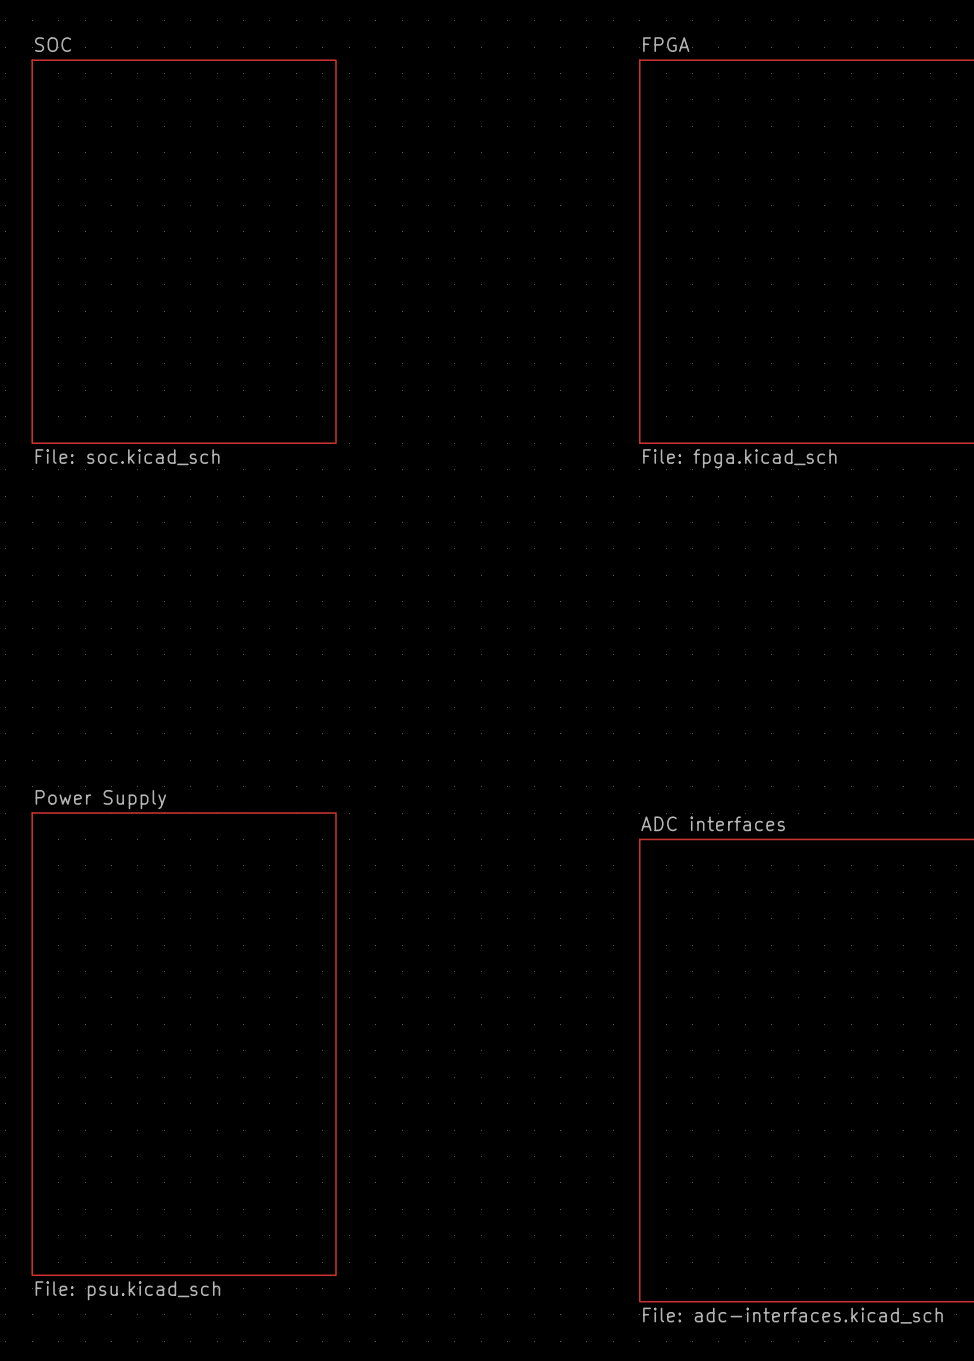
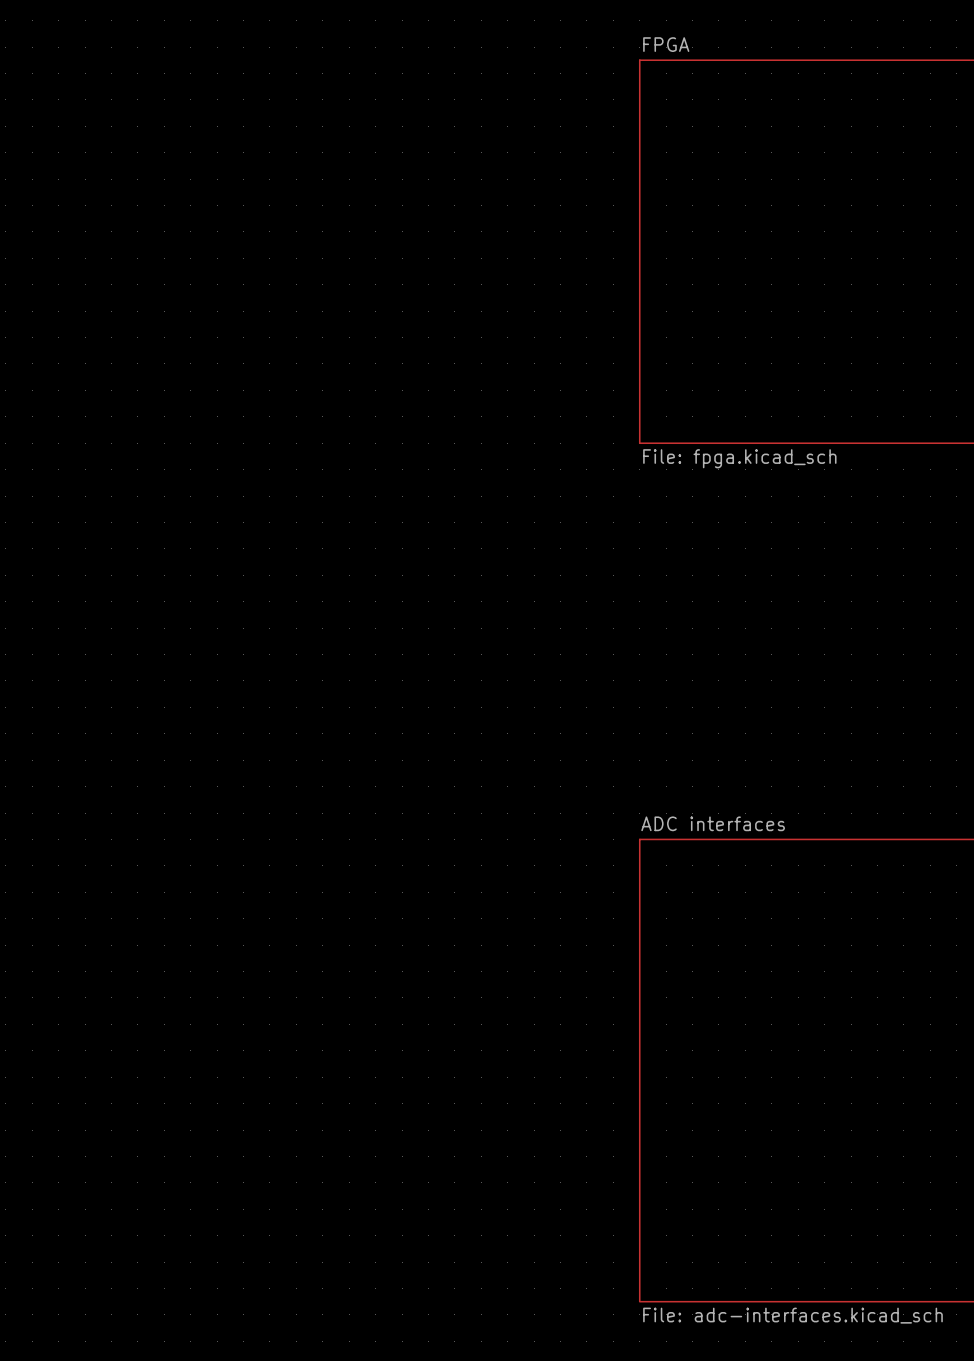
sheet SOC: File: soc.kicad_sch (184, 251) -> none
sheet Power Supply: File: psu.kicad_sch (184, 1044) -> none

